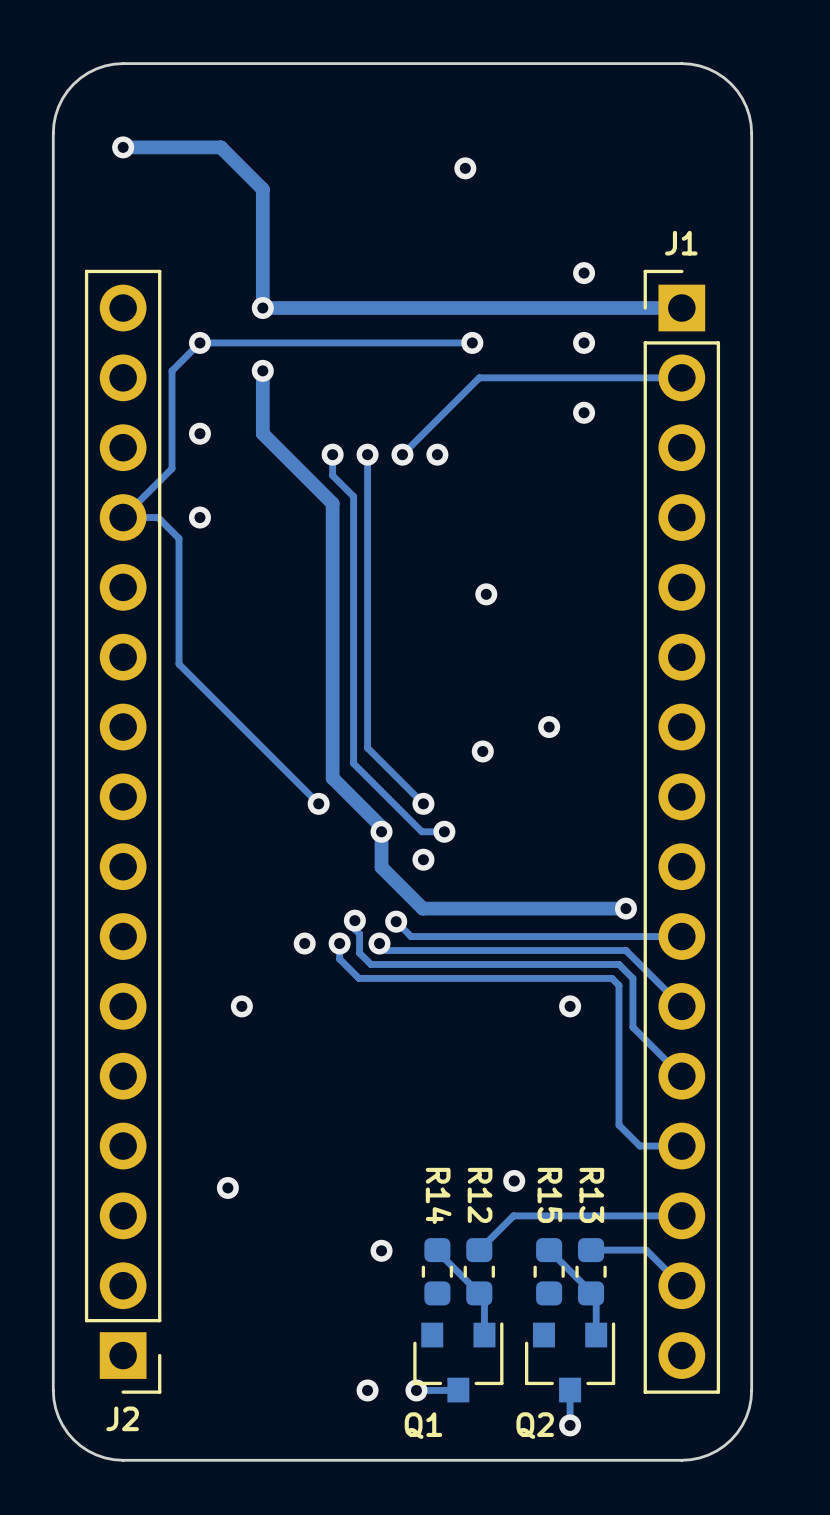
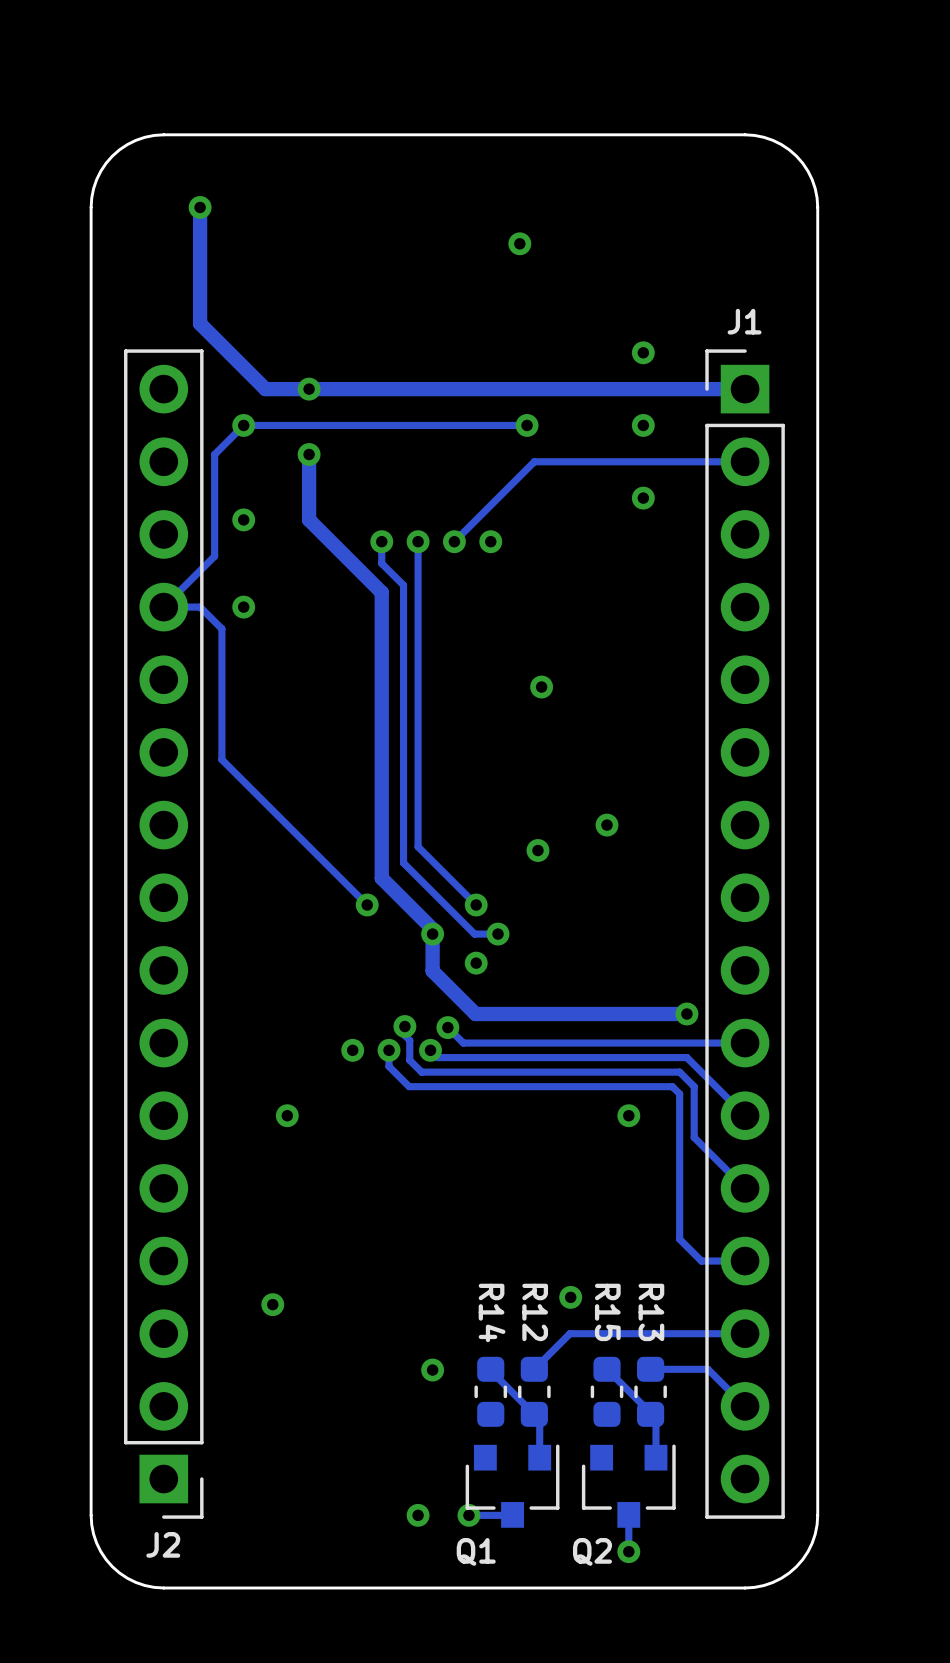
track: (123, 147) (220, 147) (262, 189) (262, 308) -> (200, 207) (200, 323) (265, 389) (309, 389)
via position: (123, 147) -> (200, 207)

